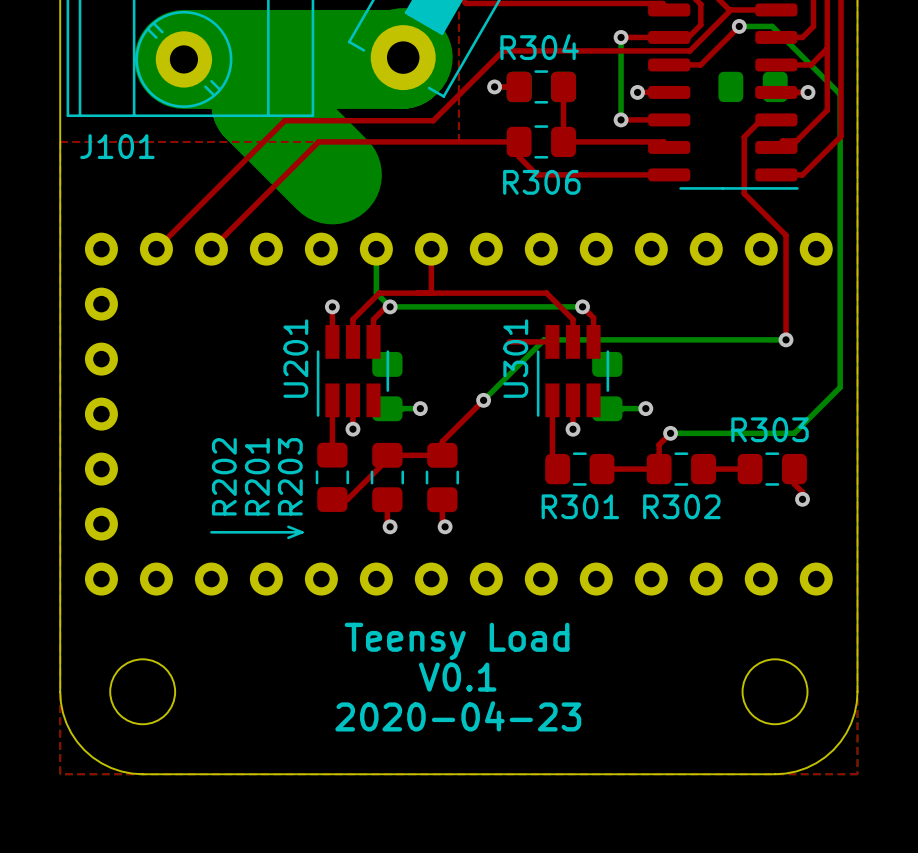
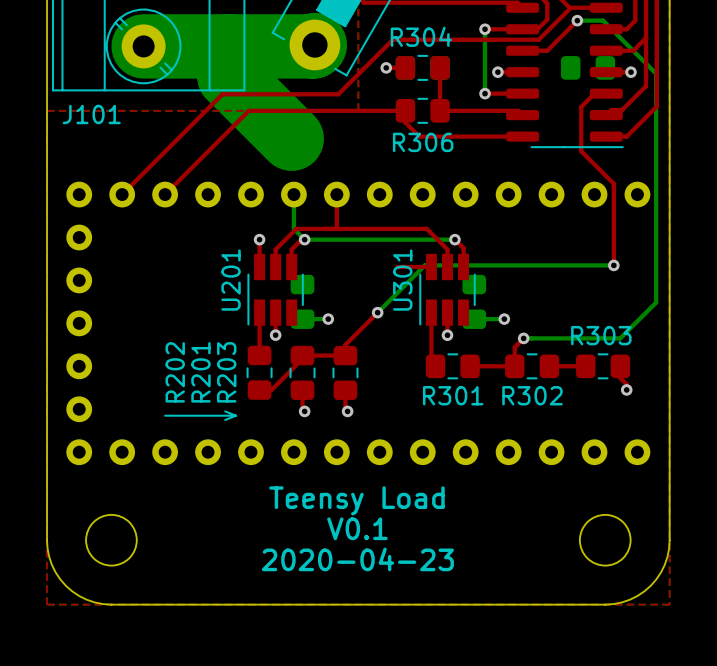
bottom track width: thick (403, 57) (401, 59) (183, 59) -> thin (314, 44) (143, 46)
bottom track: (260, 59) (260, 103) (332, 174) -> none
bottom track: none -> (229, 46) (229, 76) (291, 138)

